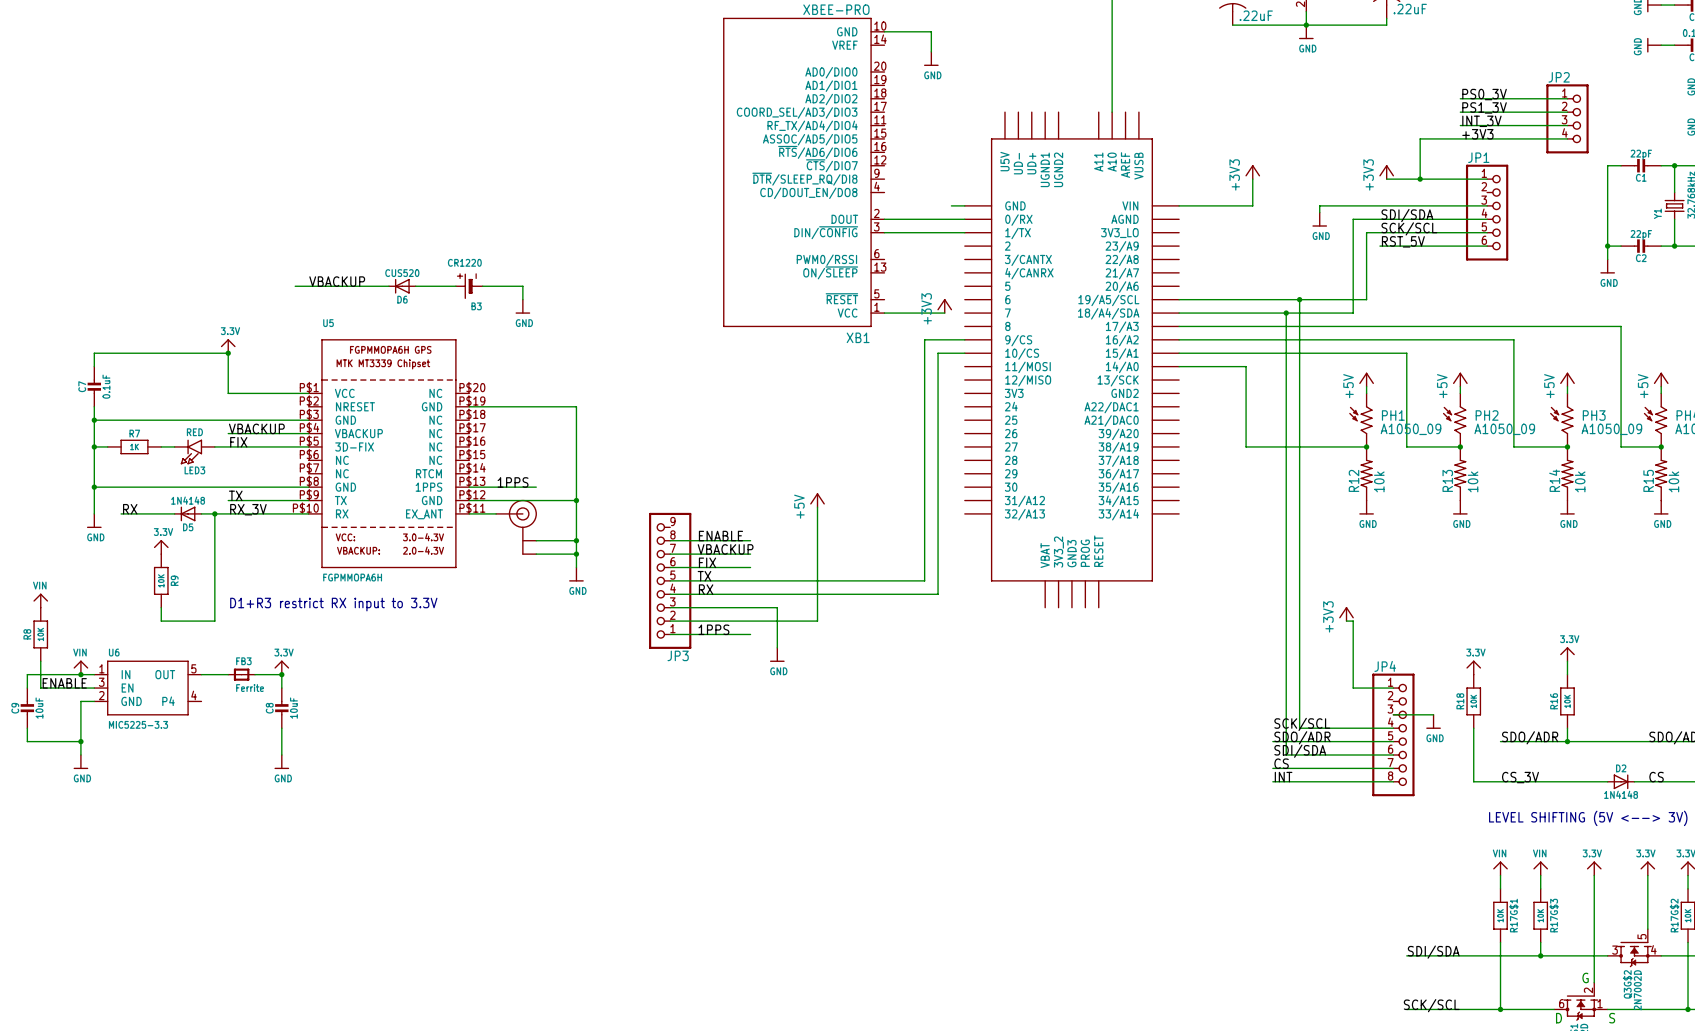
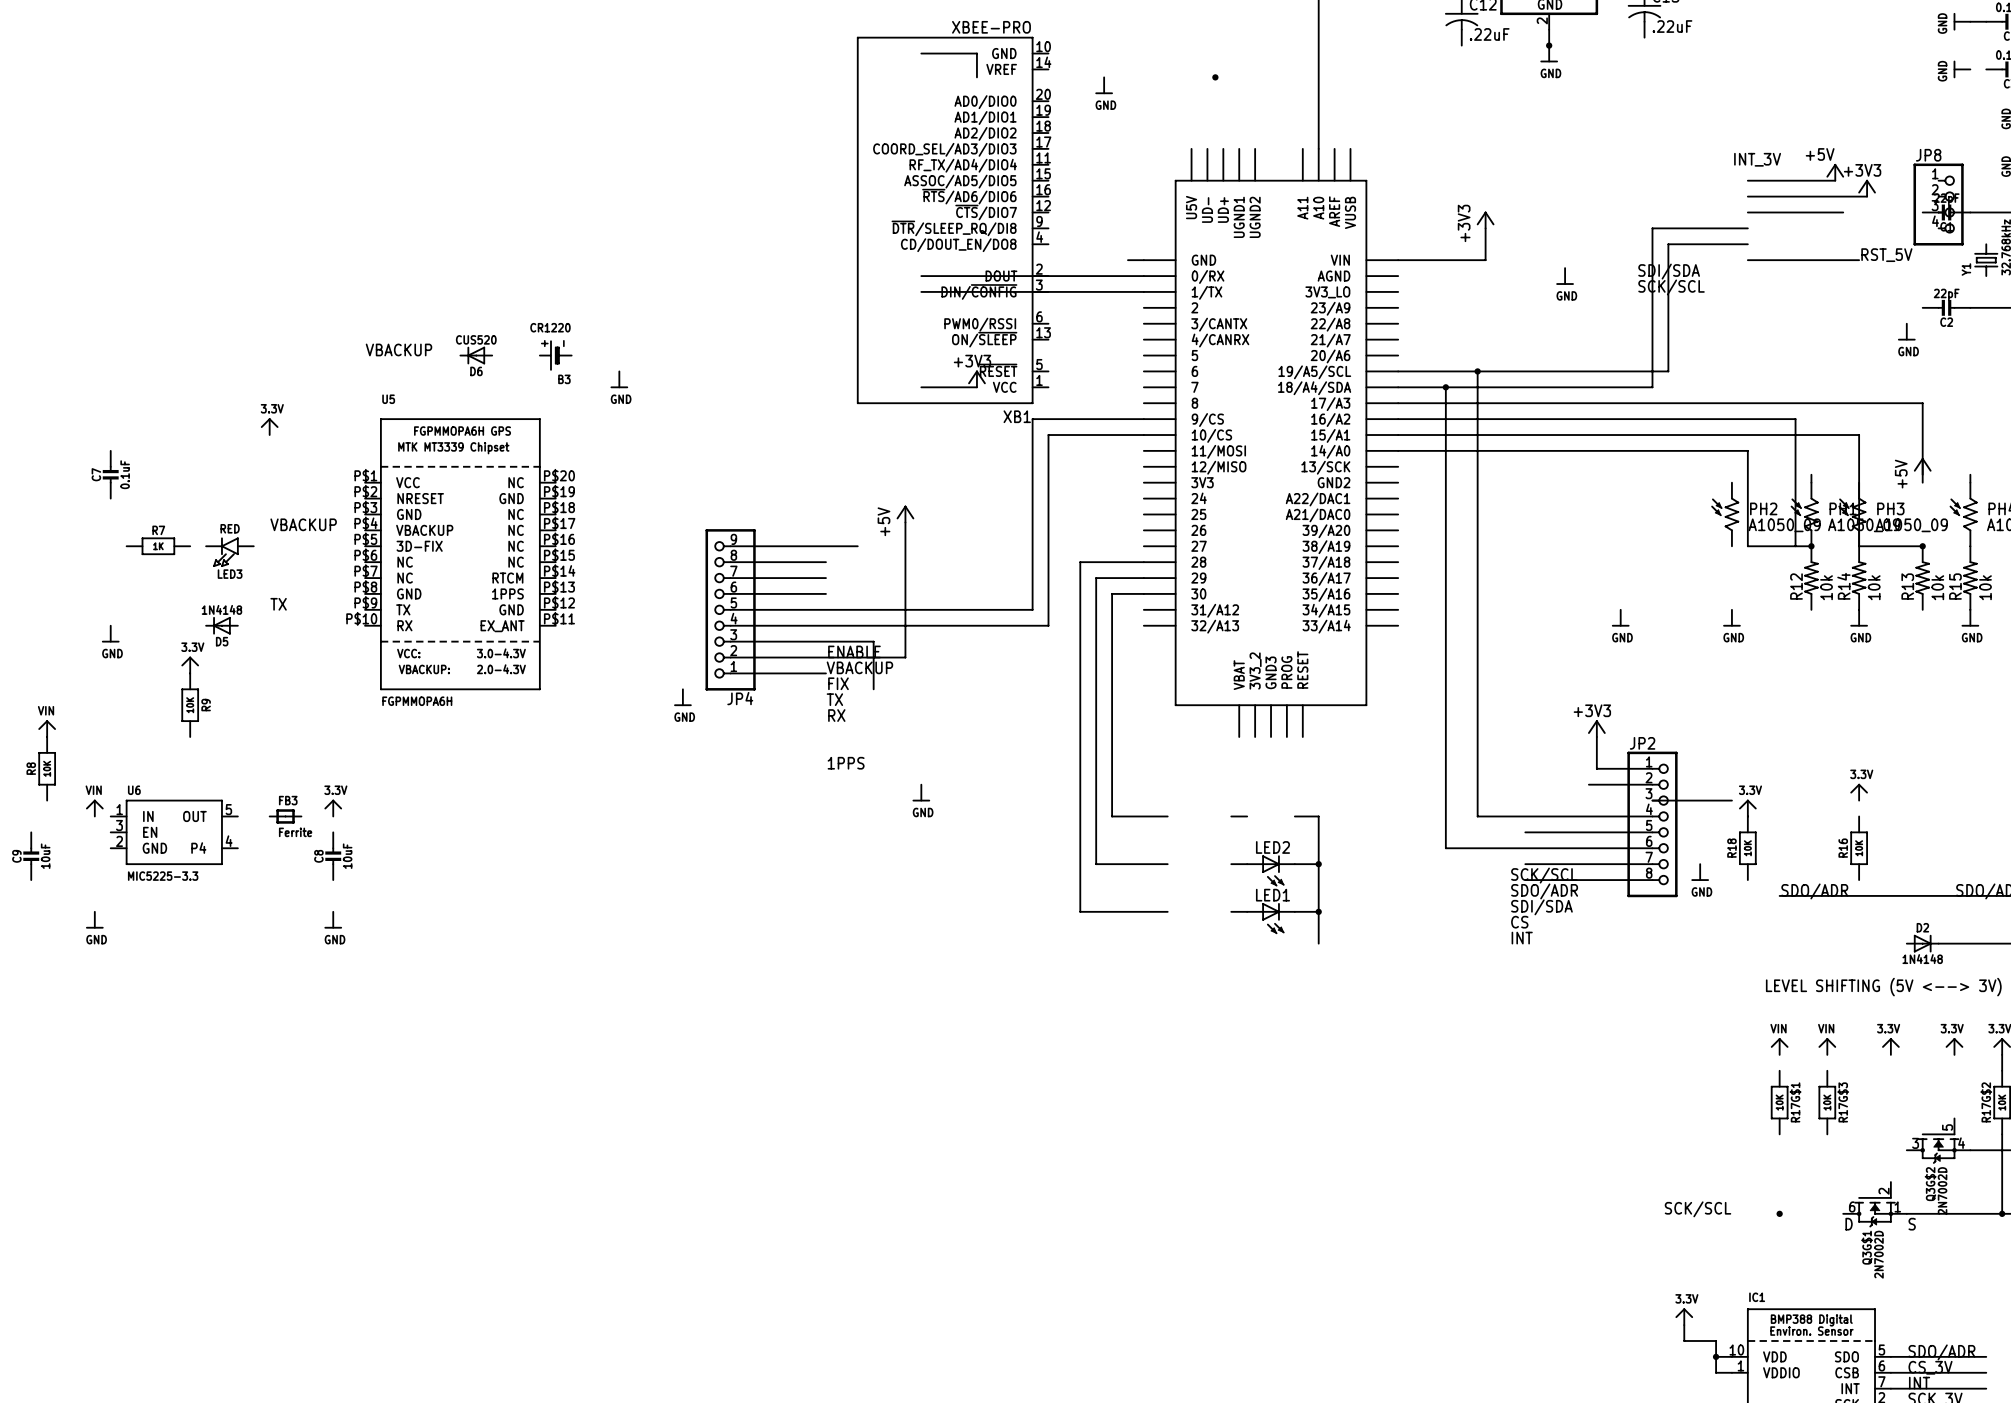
wire: (1386, 18) (1386, 25) (1232, 25) -> none
wire: (884, 31) (931, 31) (931, 51) -> (921, 53) (976, 53) (976, 77)
wire: (1661, 45) (1674, 45) -> none
junction: none -> (1215, 77)
JP2 name position: JP2 (1559, 77) -> JP2 (1642, 743)
JP2 symbol: [1546, 84, 1589, 154] -> [1627, 751, 1678, 898]
label: PS0_3V (1484, 94) -> none
wire: (1460, 98) (1567, 98) -> none
label: PS1_3V (1484, 107) -> none
wire: (1460, 112) (1567, 112) -> none
wire: (1460, 125) (1567, 125) -> none
power symbol: none -> +5V (1835, 172)
label: +3V3 (1477, 134) -> none
wire: (1473, 138) (1420, 138) (1420, 179) -> none
wire: (1547, 138) (1567, 138) -> none
power symbol: none -> +3V3 (1867, 188)
wire: none -> (1747, 196) (1867, 196)
JP8: none -> (1938, 204)
wire: none -> (1747, 212) (1843, 212)
wire: (1621, 165) (1607, 165) (1607, 259) -> none
wire: (1674, 165) (1674, 192) -> none
junction: (1674, 165) -> none
power symbol: +3V3 (1386, 172) -> none
wire: (1386, 179) (1393, 179) -> none
junction: (1420, 179) -> none
wire: (1473, 179) (1487, 179) -> none
label: none -> RST_5V (1886, 255)
wire: (1473, 205) (1319, 205) (1319, 212) -> none
wire: none -> (1763, 260) (1859, 260)
JP1: (1487, 212) -> none
wire: none -> (921, 276) (1048, 276)
wire: (1487, 219) (1353, 219) (1353, 313) -> (1652, 228) (1652, 387) (1604, 387)
wire: (1674, 219) (1674, 246) -> none
wire: none -> (921, 291) (1048, 291)
wire: (1487, 232) (1366, 232) (1366, 299) -> (1747, 244) (1668, 244) (1668, 371) (1620, 371)
label: RST_5V (1403, 241) -> none
wire: (1379, 246) (1487, 246) -> none
wire: (1607, 246) (1621, 246) -> none
junction: (1607, 246) -> none
junction: (1674, 246) -> none
wire: (295, 286) (388, 286) -> none
wire: (415, 286) (455, 286) -> none
wire: (482, 286) (522, 286) (522, 299) -> none
wire: none -> (1477, 371) (1477, 450) (1747, 450) (1747, 546) (1795, 546)
junction: none -> (1477, 371)
wire: (1299, 299) (1299, 728) -> (1525, 880) (1541, 880)
junction: (1299, 299) -> none
power symbol position: +3V3 (944, 306) -> +3V3 (976, 378)
power symbol text rotation: 0° (926, 308) -> 90° clockwise (972, 361)
wire: none -> (921, 387) (976, 387)
wire: (884, 313) (944, 313) -> none
wire: none -> (1445, 387) (1445, 848) (1652, 848)
junction: none -> (1445, 387)
wire: (1286, 313) (1286, 755) (1393, 755) -> none
junction: (1286, 313) -> none
wire: (924, 339) (924, 473) -> (1143, 578) (1096, 578)
wire: none -> (1096, 419) (1032, 419) (1032, 609) (730, 609)
junction: (228, 353) -> none
wire: (938, 353) (938, 487) -> (1143, 593) (1112, 593)
wire: none -> (1112, 435) (1048, 435) (1048, 625) (730, 625)
wire: (1406, 353) (1406, 446) (1460, 446) -> (1668, 435) (1859, 435) (1859, 474)
wire: (94, 366) (94, 353) (228, 353) (228, 393) (308, 393) -> none
power symbol: +5V (1366, 379) -> none
power symbol: +5V (1460, 379) -> none
power symbol: +5V (1567, 379) -> none
power symbol: none -> +5V (1922, 466)
power symbol: +5V (1661, 379) -> none
wire: (1366, 386) (1366, 393) -> none
wire: (1460, 386) (1460, 393) -> (1811, 474) (1811, 482)
wire: none -> (1859, 482) (1859, 546) (1922, 546)
wire: (1621, 393) (1621, 446) (1661, 446) -> none
wire: (94, 406) (94, 513) -> none
wire: (469, 406) (576, 406) (576, 567) -> none
wire: (94, 420) (308, 420) -> none
junction: (94, 420) -> none
PH1 position: (1361, 420) -> (1804, 514)
wire: none -> (905, 522) (905, 657) (889, 657)
wire: (228, 433) (308, 433) -> none
label: FIX (238, 442) -> none
wire: (94, 446) (107, 446) -> none
junction: (94, 446) -> none
wire: (161, 446) (174, 446) -> none
wire: (214, 446) (308, 446) -> none
wire: none -> (730, 546) (857, 546)
wire: (1246, 446) (1366, 446) -> (1477, 546) (1477, 816) (1652, 816)
junction: (1366, 446) -> none
junction: (1460, 446) -> none
wire: (1527, 446) (1567, 446) -> none
junction: none -> (1811, 546)
junction: (1567, 446) -> none
junction: none -> (1922, 546)
junction: (1661, 446) -> none
wire: none -> (730, 562) (825, 562)
wire: none -> (1143, 562) (1080, 562) (1080, 911) (1167, 911)
wire: none -> (730, 578) (825, 578)
R12 position: (1366, 473) -> (1811, 578)
R13 position: (1460, 473) -> (1922, 578)
label: 1PPS (513, 482) -> none
wire: (94, 487) (308, 487) -> none
junction: (94, 487) -> none
wire: (469, 487) (536, 487) -> none
wire: (228, 500) (308, 500) -> none
wire: (469, 500) (576, 500) -> none
junction: (576, 500) -> none
power symbol position: +5V (817, 500) -> +5V (905, 514)
wire: (817, 507) (817, 621) (670, 621) -> none
label: RX (130, 509) -> none
label: RX_3V (248, 509) -> none
wire: (121, 513) (174, 513) -> none
wire: (201, 513) (308, 513) -> none
wire: (214, 513) (214, 621) (161, 621) (161, 607) -> none
junction: (214, 513) -> none
wire: (469, 513) (496, 513) -> none
part: (516, 527) -> none
wire: none -> (730, 641) (873, 641) (873, 689)
wire: (536, 540) (576, 540) -> none
junction: (576, 540) -> none
wire: none -> (730, 657) (794, 657)
wire: (536, 554) (576, 554) -> none
junction: (576, 554) -> none
wire: (696, 554) (750, 554) -> (730, 673) (794, 673)
wire: (670, 567) (750, 567) -> (730, 593) (825, 593)
wire: (670, 580) (924, 580) -> (1167, 864) (1096, 864) (1096, 705)
JP3: (670, 580) -> none
wire: (670, 594) (938, 594) -> (1167, 816) (1112, 816) (1112, 721)
text: D1+R3 restrict RX input to 3.3V (333, 604) -> none
wire: (670, 607) (777, 607) (777, 647) -> none
wire: none -> (1596, 737) (1596, 768) (1652, 768)
power symbol position: +3V3 (1346, 614) -> +3V3 (1596, 728)
power symbol text rotation: 0° (1328, 616) -> 90° clockwise (1592, 710)
wire: (1346, 621) (1353, 621) (1353, 688) -> (1525, 832) (1604, 832)
wire: (670, 634) (750, 634) -> none
wire: none -> (1588, 784) (1652, 784)
wire: (40, 661) (40, 688) (94, 688) -> none
wire: none -> (1652, 800) (1731, 800)
wire: (1567, 661) (1567, 674) -> none
JP4 name position: JP4 (1385, 666) -> JP4 (740, 698)
JP4 symbol: [1372, 673, 1415, 797] -> [705, 529, 756, 691]
junction: (80, 674) -> none
wire: (94, 674) (27, 674) (27, 688) -> none
wire: (201, 674) (228, 674) -> none
wire: (255, 674) (281, 674) (281, 688) -> none
junction: (281, 674) -> none
wire: none -> (1231, 816) (1247, 816)
wire: none -> (1294, 816) (1318, 816) (1318, 943)
label: ENABLE (64, 683) -> none
wire: (94, 701) (80, 701) (80, 755) -> none
wire: none -> (1231, 864) (1247, 864)
wire: none -> (1294, 864) (1318, 864)
junction: none -> (1318, 864)
wire: (1393, 714) (1433, 714) -> (1652, 864) (1525, 864)
LED2: none -> (1271, 870)
wire: (27, 728) (27, 741) (80, 741) -> none
wire: (281, 728) (281, 755) -> none
wire: (1473, 728) (1473, 781) (1607, 781) -> none
wire: (1567, 728) (1567, 741) -> none
junction: (80, 741) -> none
wire: (1272, 741) (1393, 741) -> none
junction: (1567, 741) -> none
wire: none -> (1231, 911) (1247, 911)
wire: none -> (1294, 911) (1318, 911)
junction: none -> (1318, 911)
LED1: none -> (1271, 918)
wire: (1272, 768) (1393, 768) -> none
label: CS_3V (1520, 777) -> none
label: CS (1656, 777) -> none
wire: (1272, 781) (1393, 781) -> none
wire: (1500, 875) (1500, 888) -> none
wire: (1540, 875) (1540, 888) -> none
wire: (1594, 875) (1594, 982) -> none
wire: (1647, 875) (1647, 929) -> none
wire: (1500, 942) (1500, 1009) -> none
wire: (1540, 942) (1540, 955) -> none
label: SDI/SDA (1433, 952) -> none
wire: (1406, 955) (1607, 955) -> none
junction: (1540, 955) -> none
text: G (1585, 977) -> none
wire: (1406, 1009) (1554, 1009) -> none

